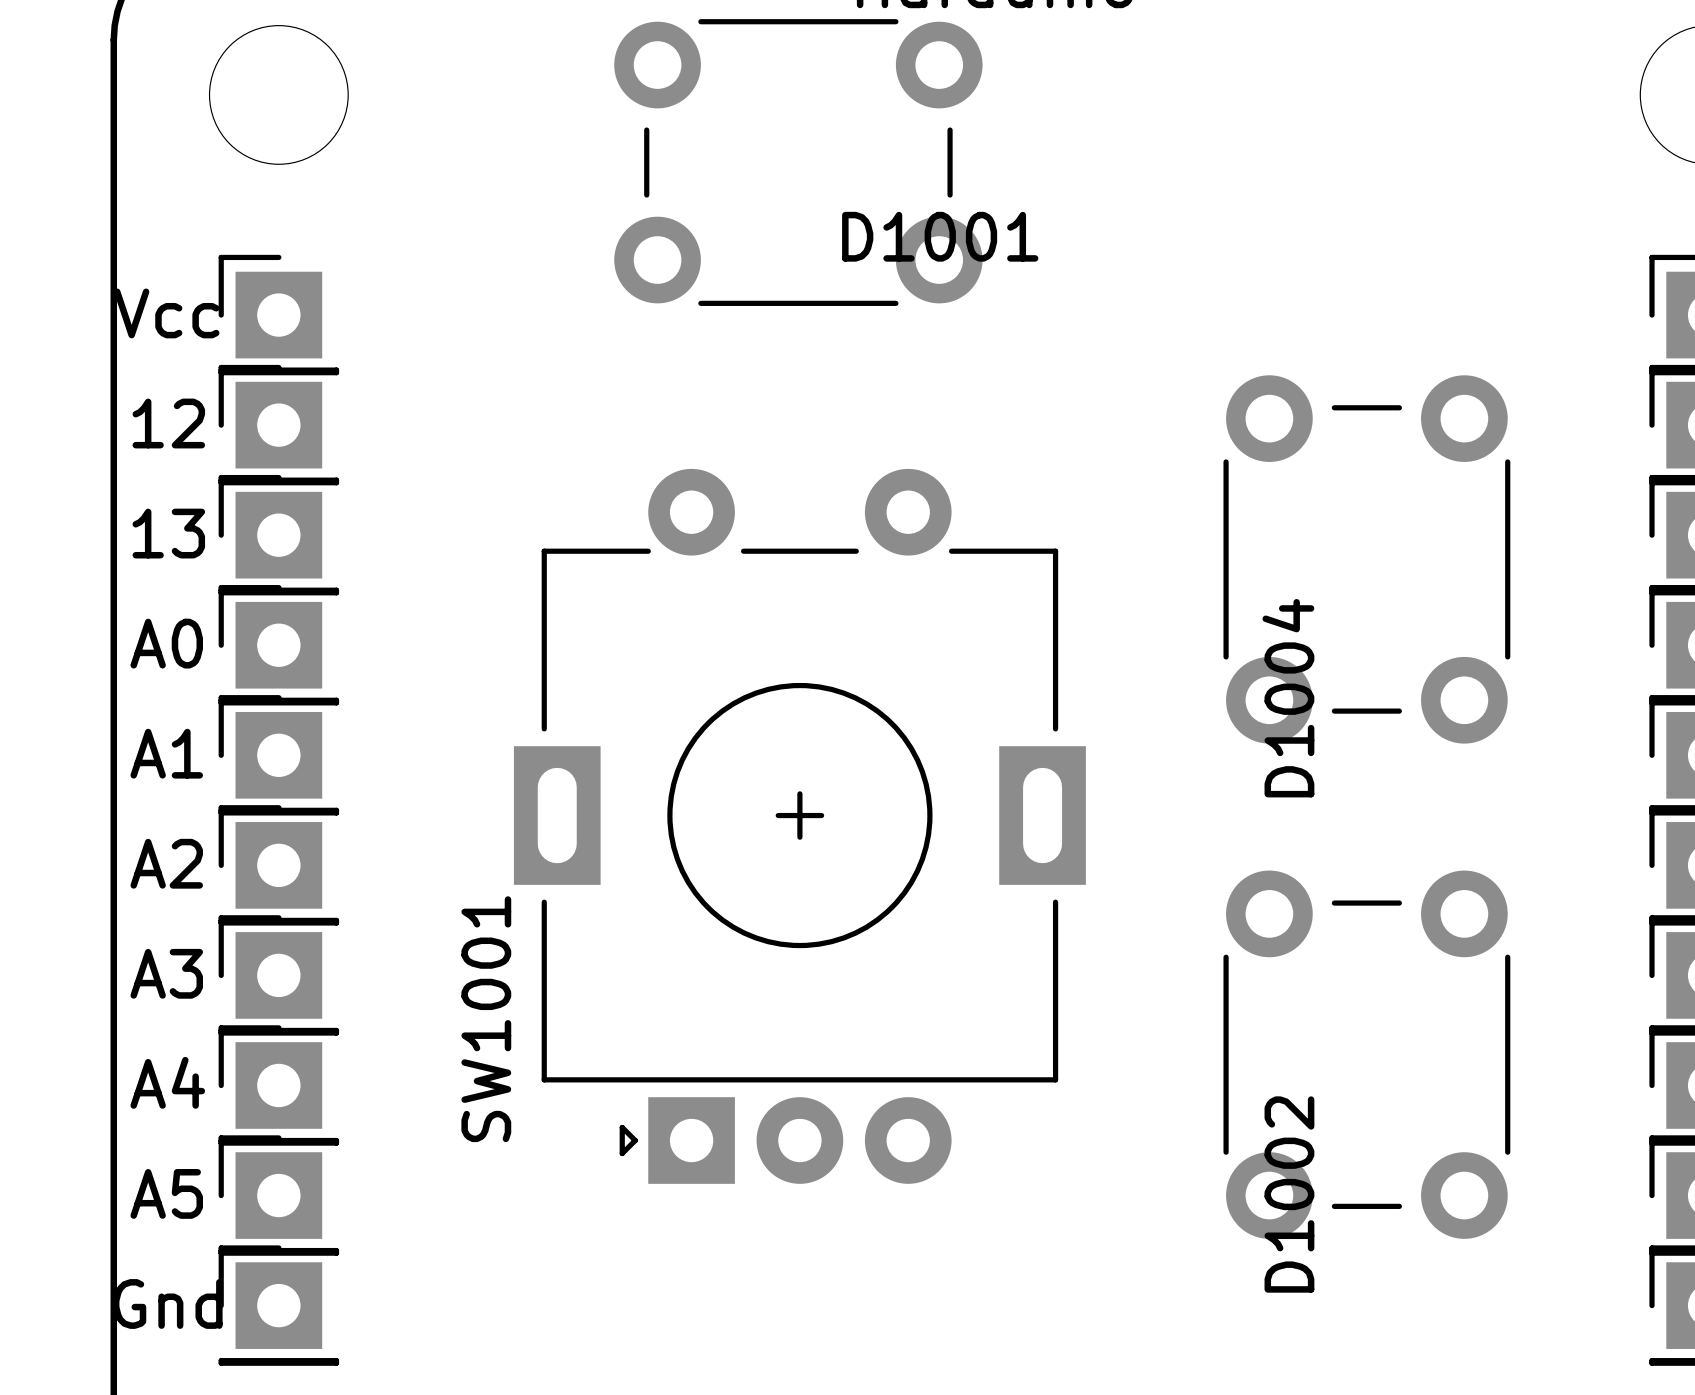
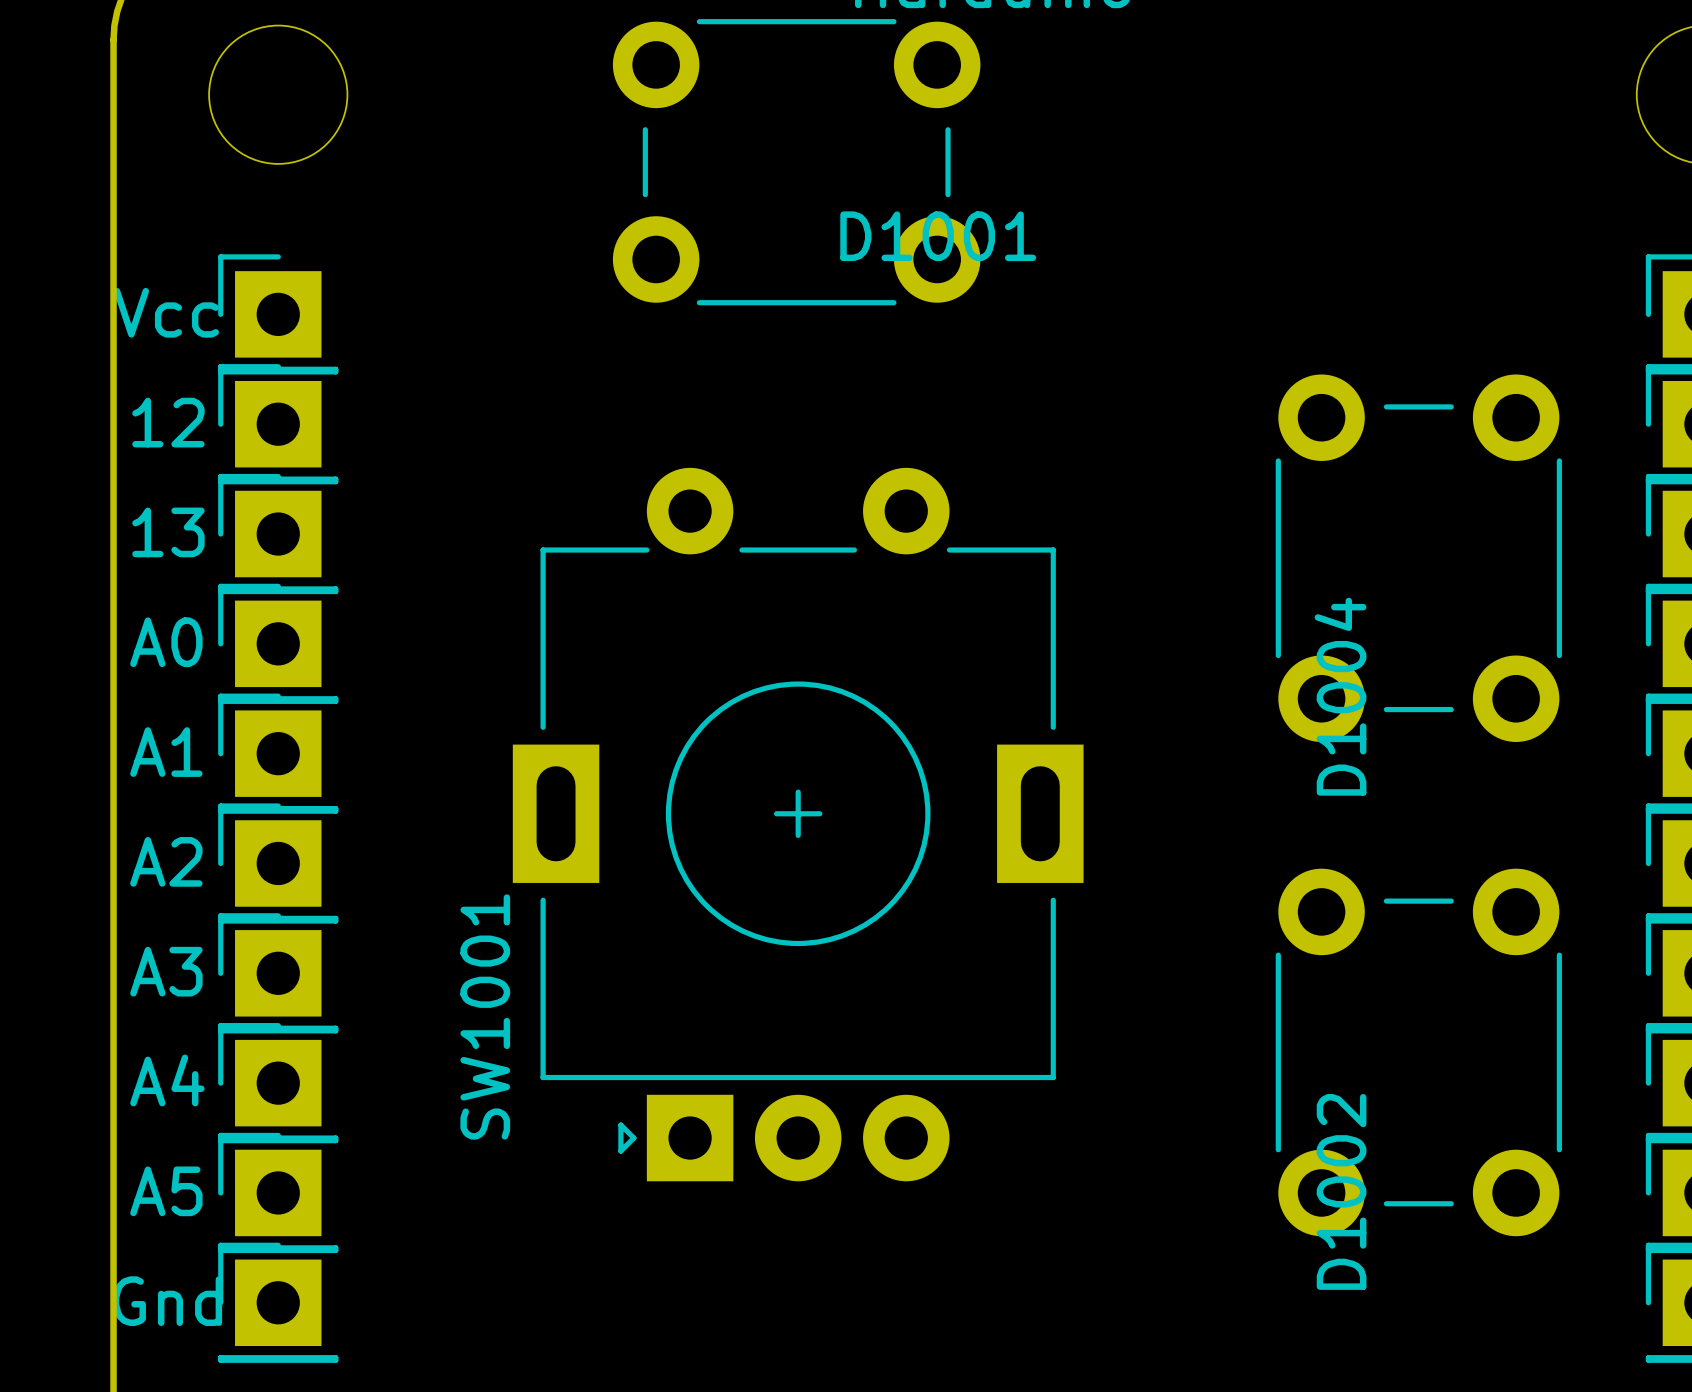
D1004 position: (1366, 559) -> (1418, 558)
D1002 position: (1366, 1054) -> (1418, 1052)

